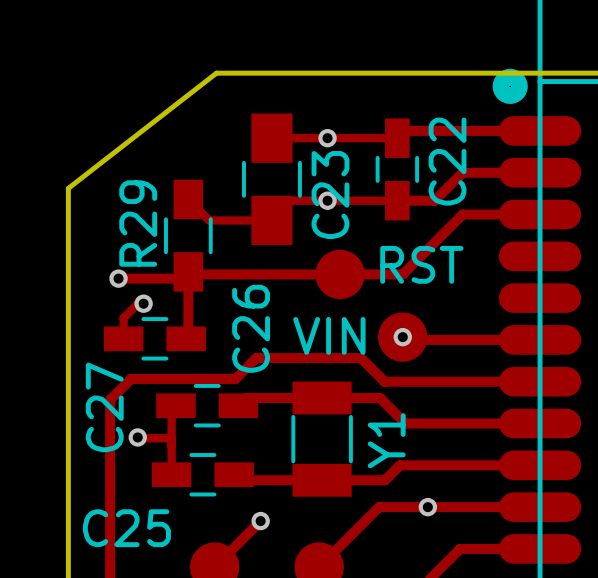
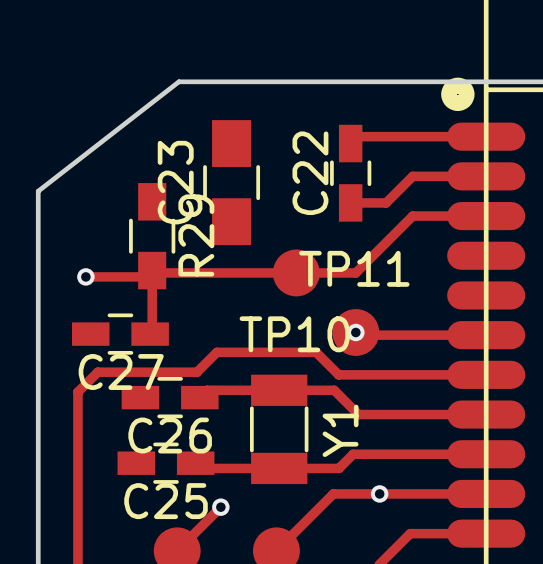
track: (271, 138) (397, 138) -> none
via: (327, 138) -> none
C22 name position: C22 (447, 161) -> C22 (310, 173)
C23 name position: C23 (330, 195) -> C23 (175, 182)
track: (188, 199) (209, 220) (271, 220) (291, 200) (397, 200) -> none
via: (327, 200) -> none
R29 name position: R29 (138, 223) -> R29 (196, 235)
RST name: RST (421, 264) -> TP11 (354, 268)
track: (143, 303) (138, 303) (123, 318) (123, 338) -> none
via: (143, 303) -> none
C26 name rotation: 0° (251, 328) -> 90° clockwise (170, 435)
C26 name position: C26 (251, 328) -> C26 (170, 435)
VIN name: VIN (329, 335) -> TP10 (294, 334)
track: (175, 405) (171, 410) (171, 474) -> none
C27 name rotation: 0° (104, 407) -> 90° clockwise (121, 372)
track: (137, 437) (171, 438) -> none
via: (137, 437) -> none
C25 name position: C25 (126, 528) -> C25 (166, 501)

